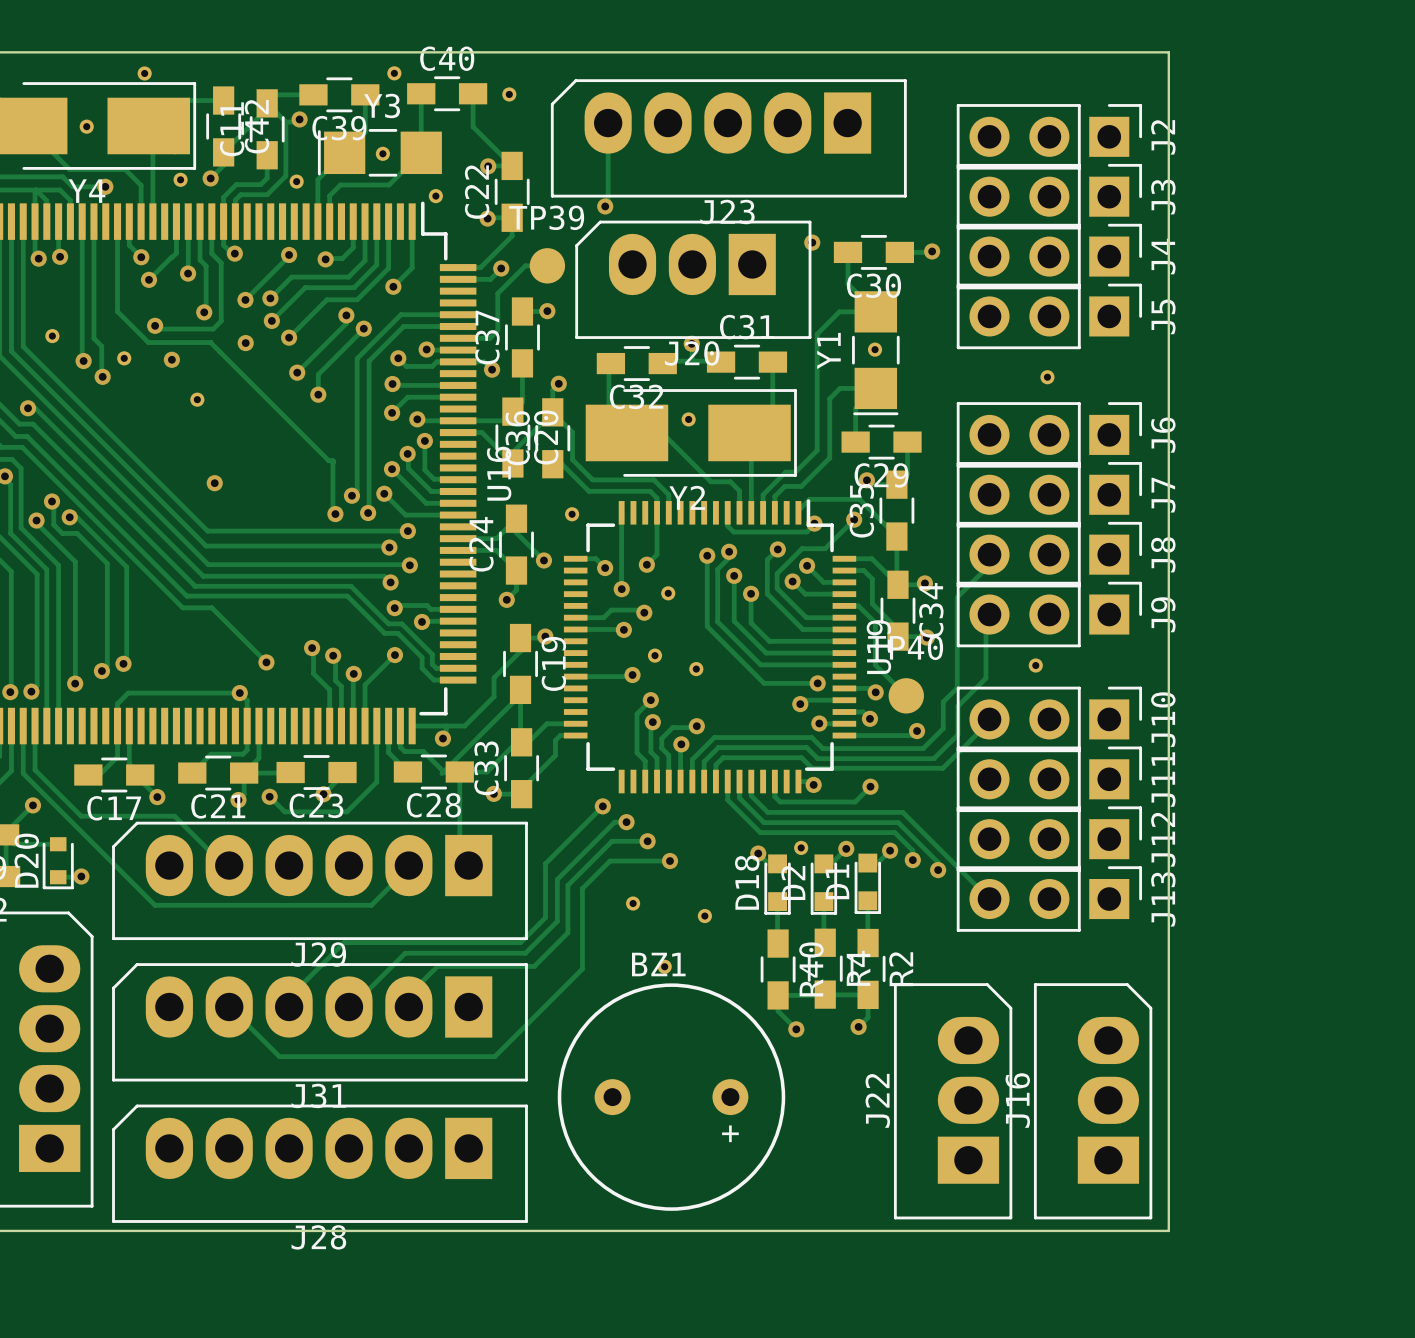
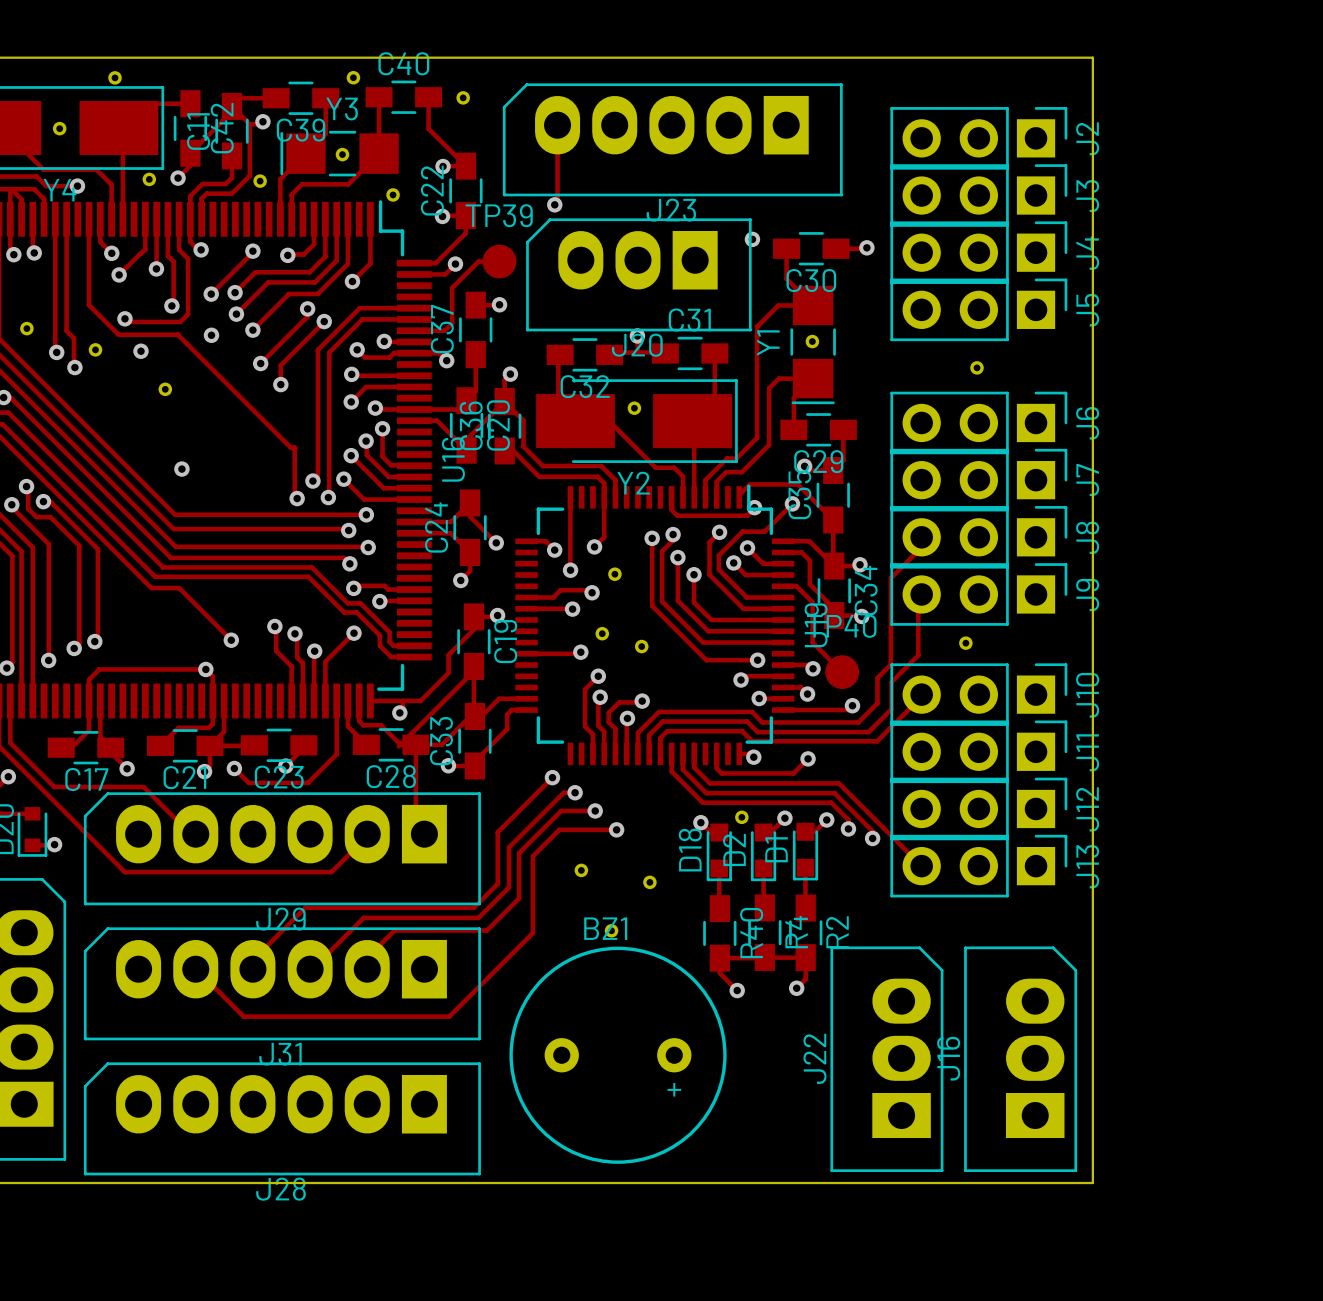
part: (572, 514) -> none

